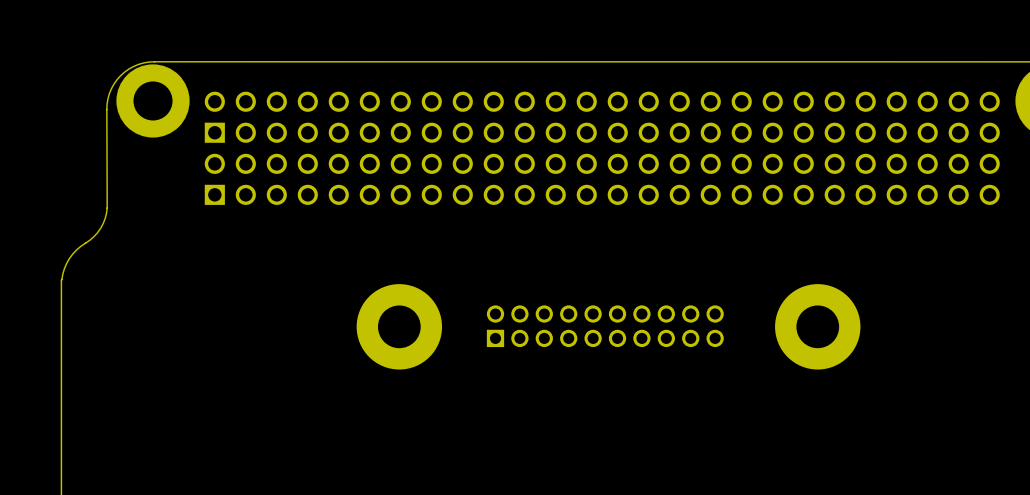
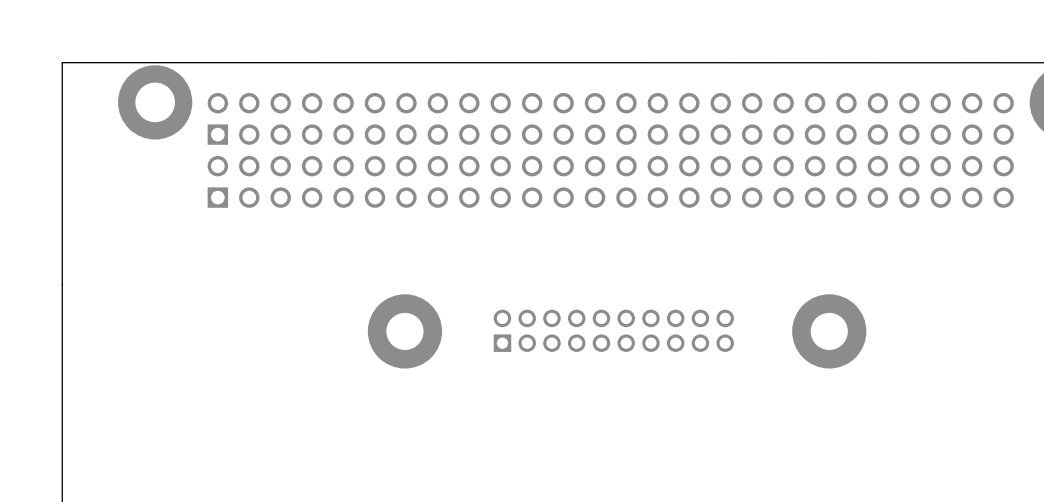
board edge: (154, 61) (143, 62) (129, 68) (117, 79) (109, 93) (106, 109) (106, 213) (97, 232) (85, 243) -> (156, 62) (62, 62) (62, 284)
board edge: (85, 243) (69, 258) (61, 280) -> none
part footprint: [356, 284, 443, 370] -> [367, 294, 443, 369]
part footprint: [775, 284, 861, 370] -> [792, 294, 867, 369]

